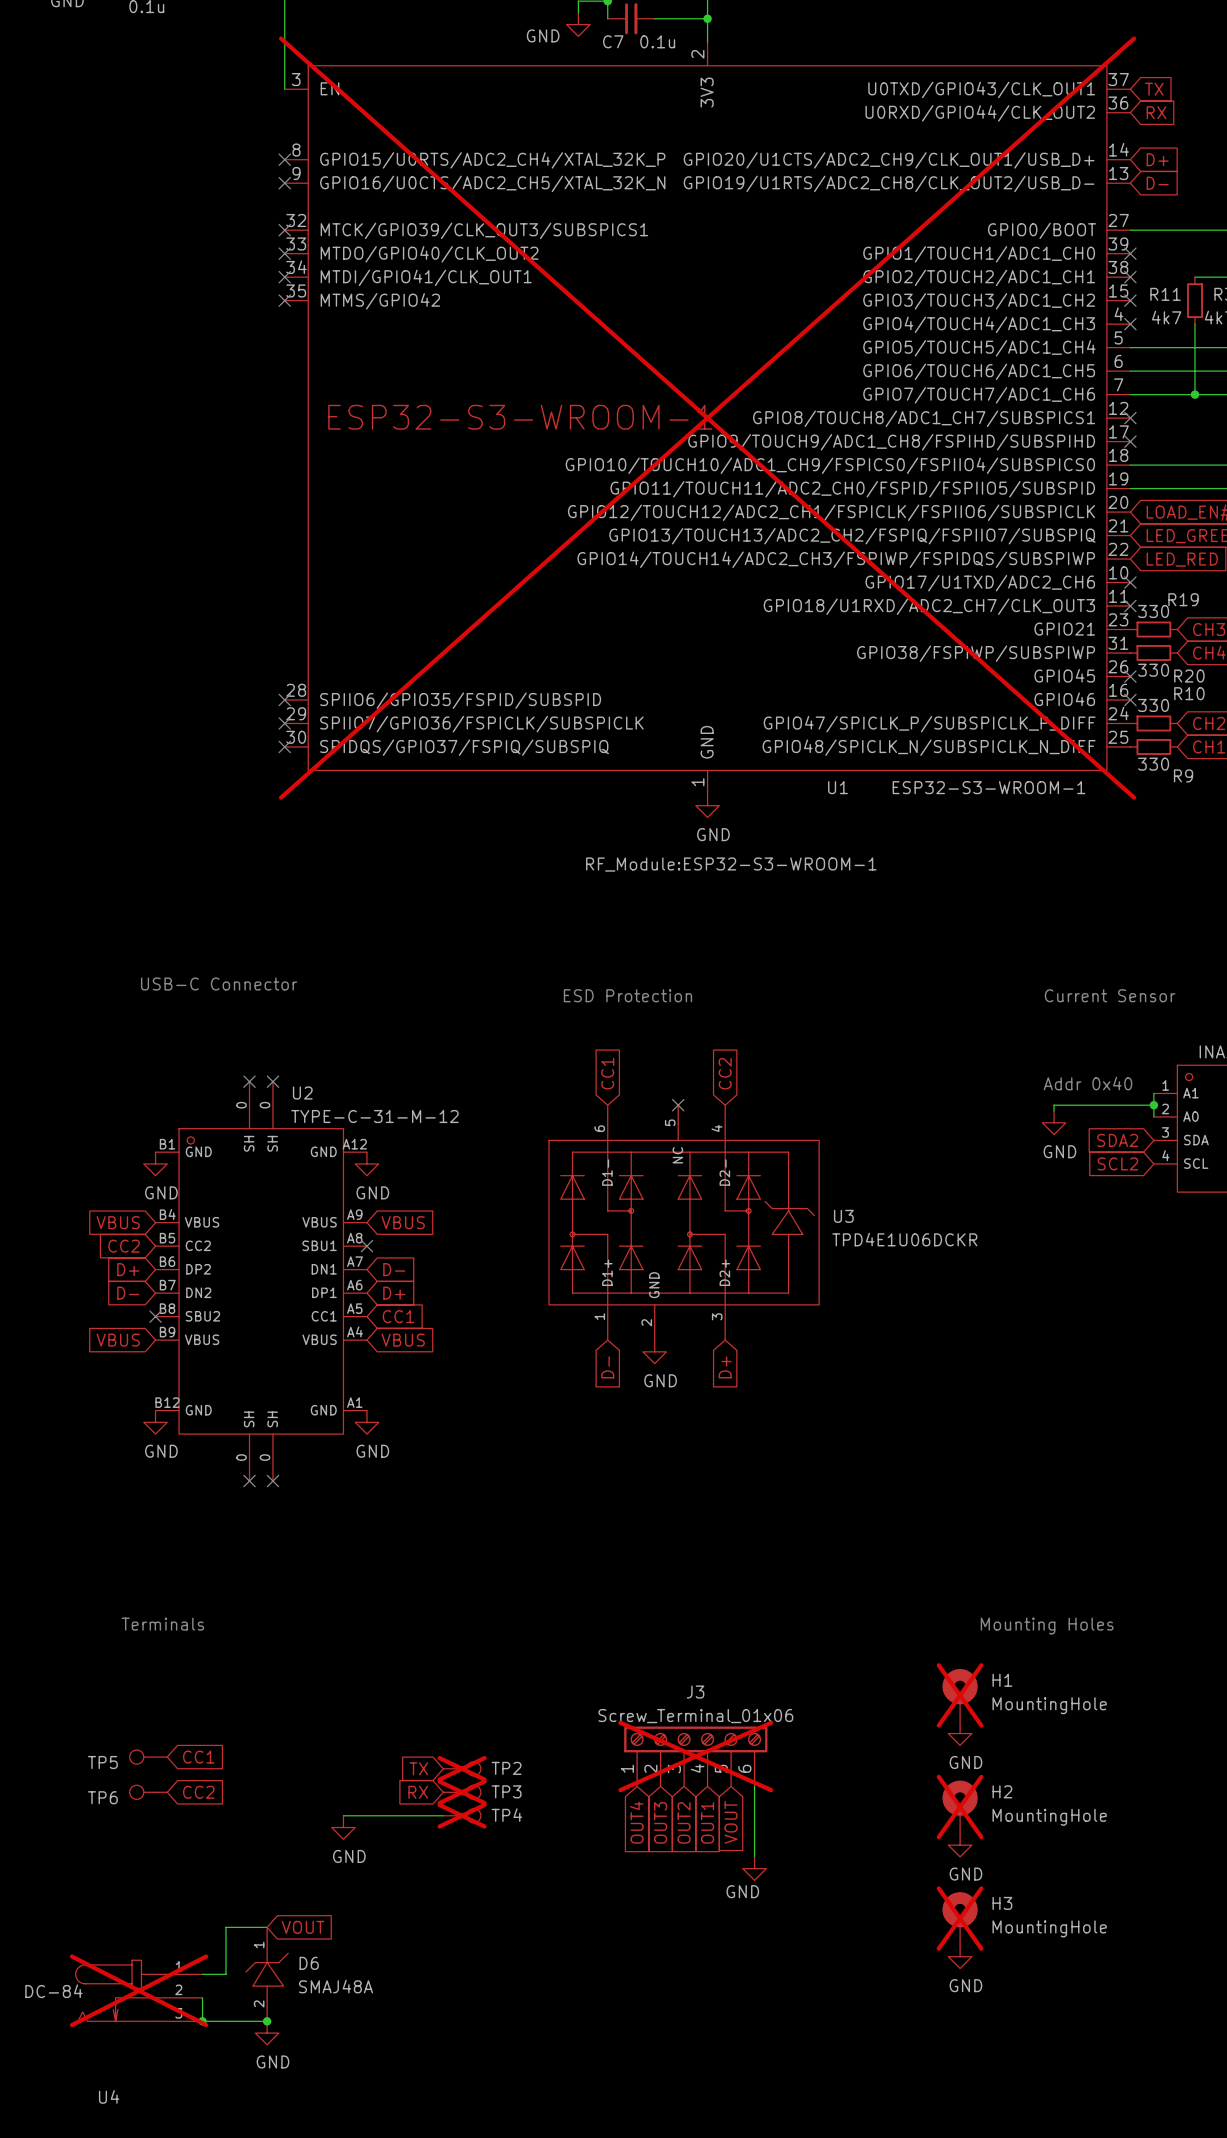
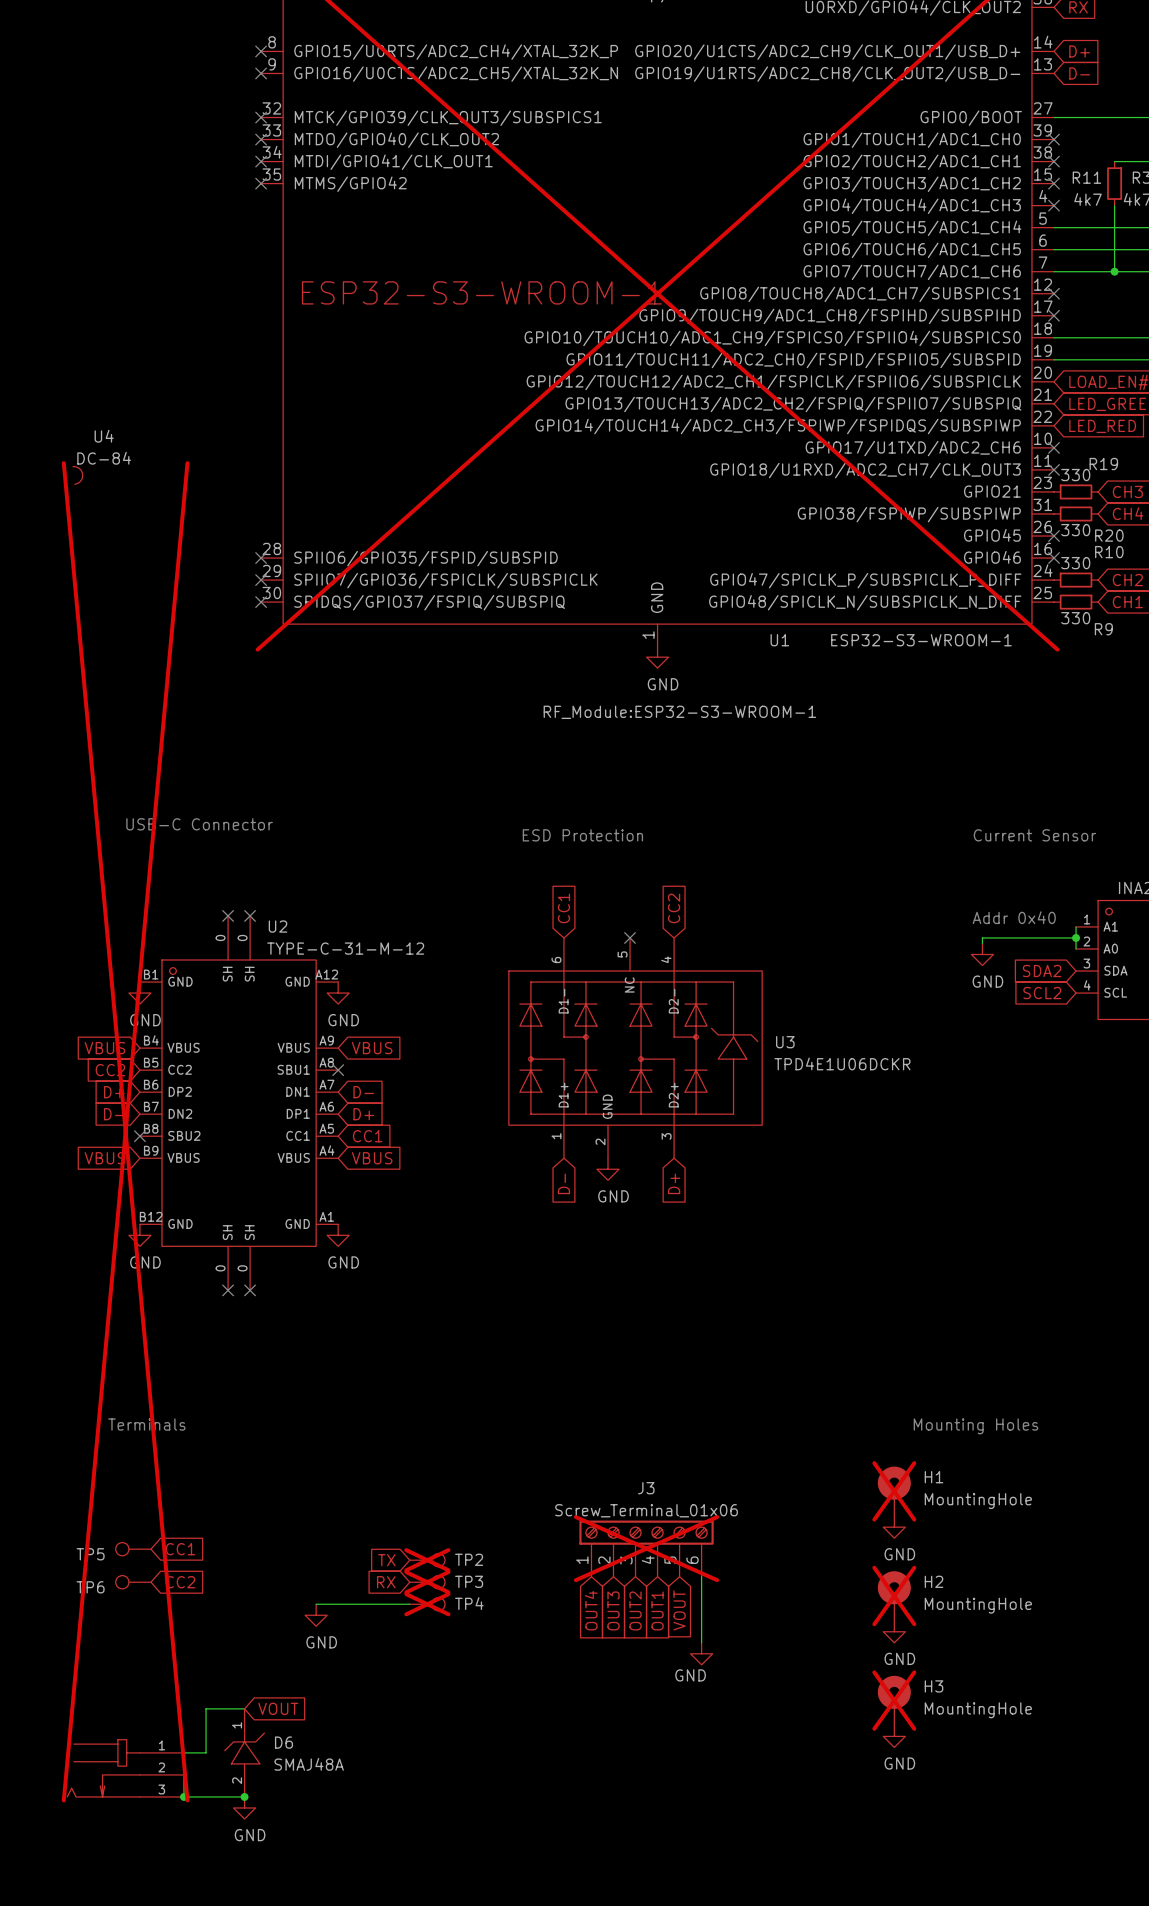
U4 symbol: [75, 1960, 203, 2022] -> [67, 466, 185, 1797]
U4 value position: DC-84 (53, 1991) -> DC-84 (104, 458)
U4 name position: U4 (109, 2096) -> U4 (104, 436)

